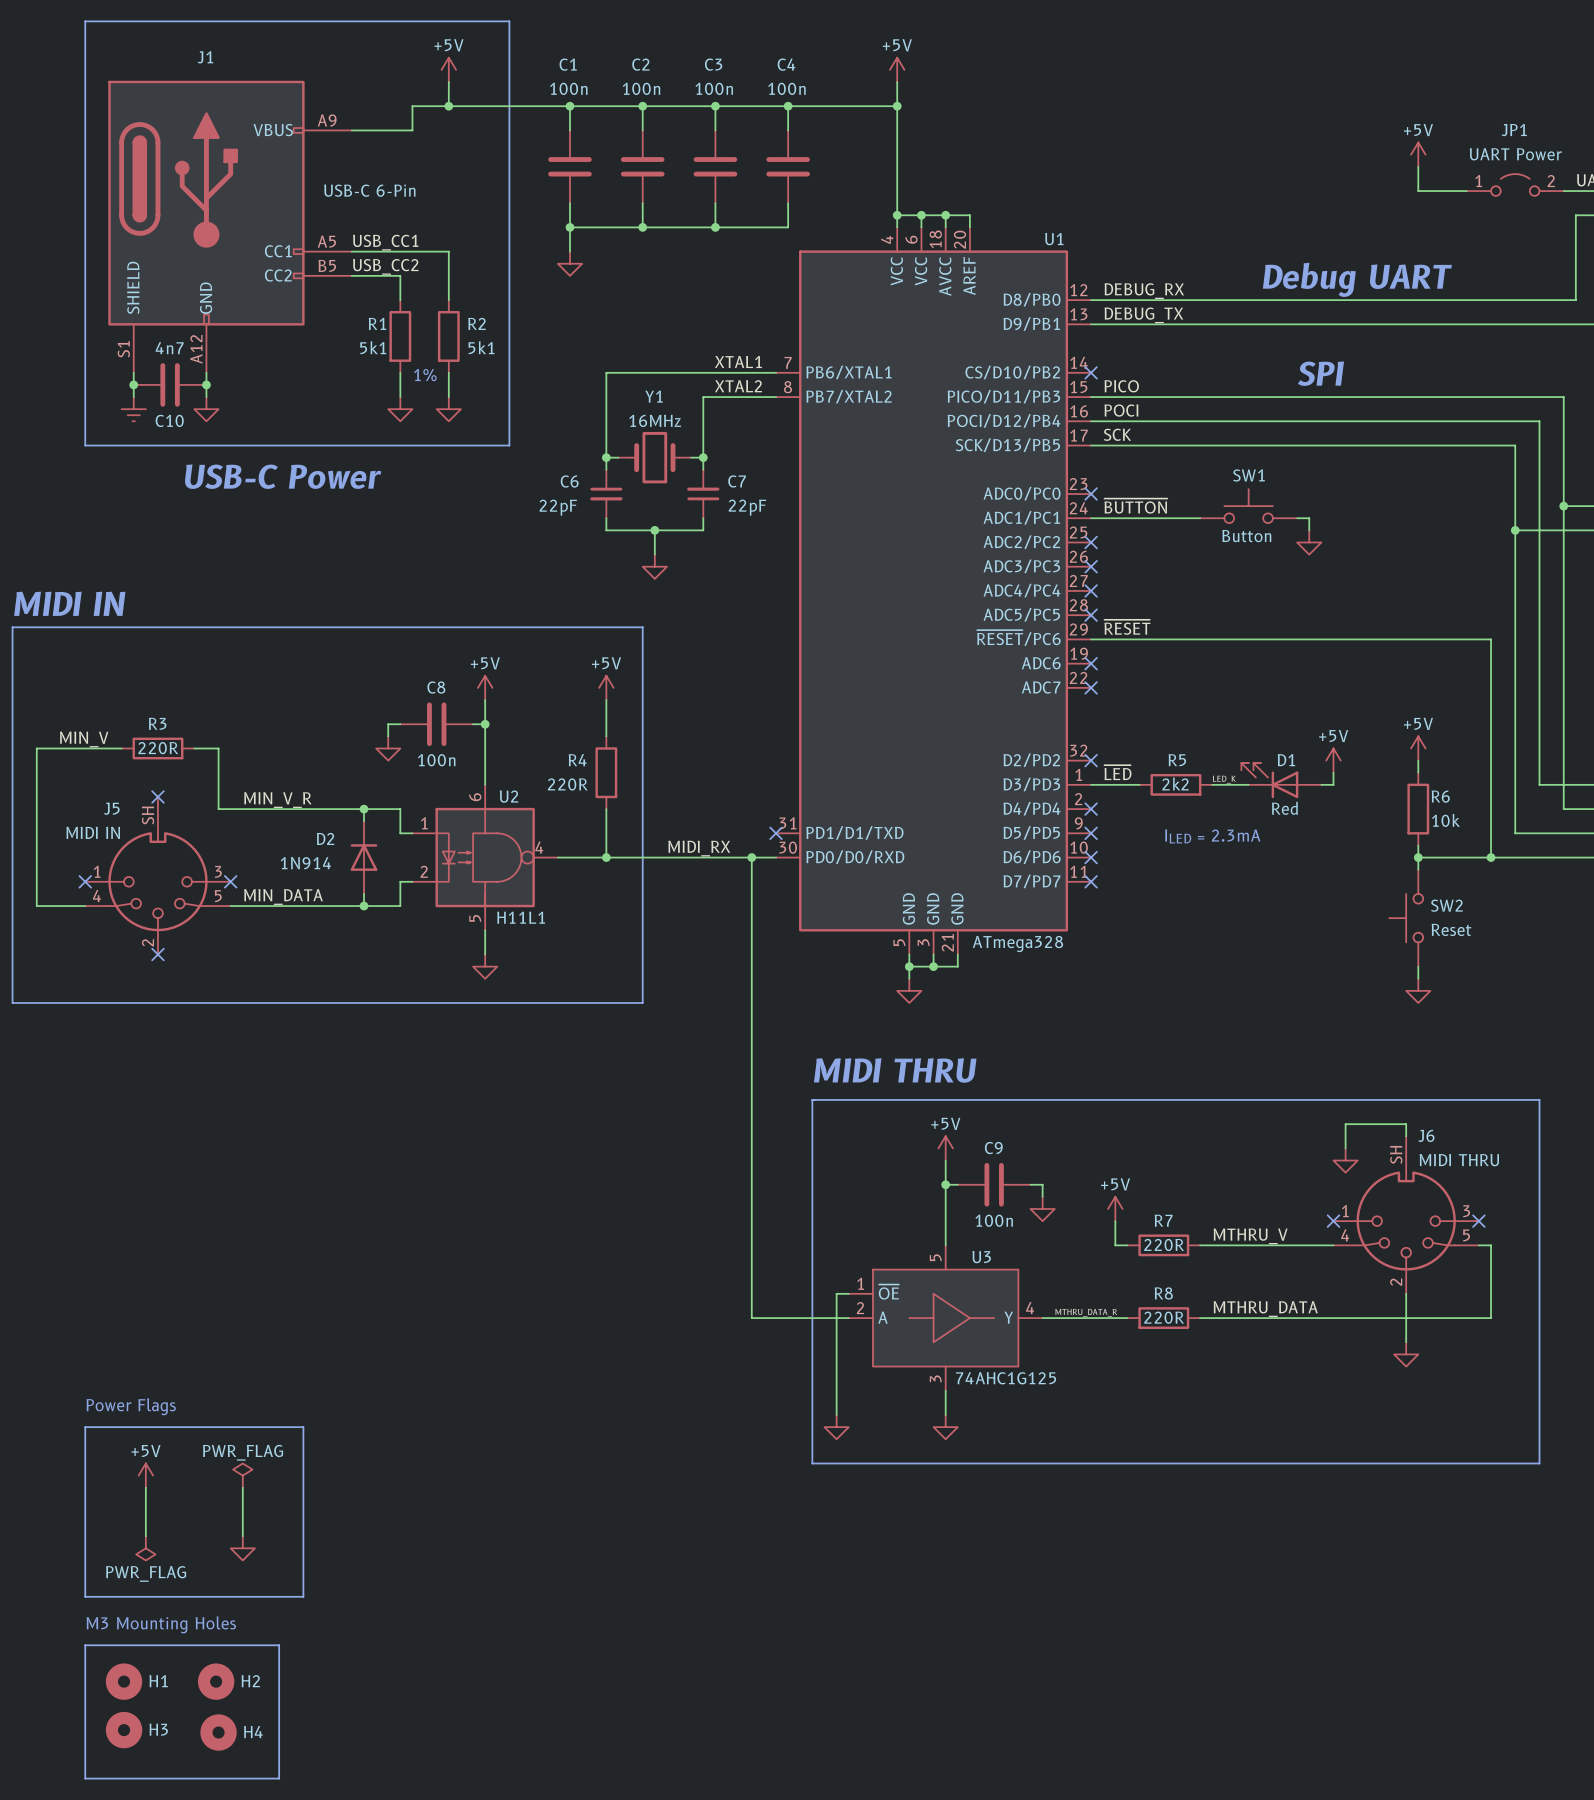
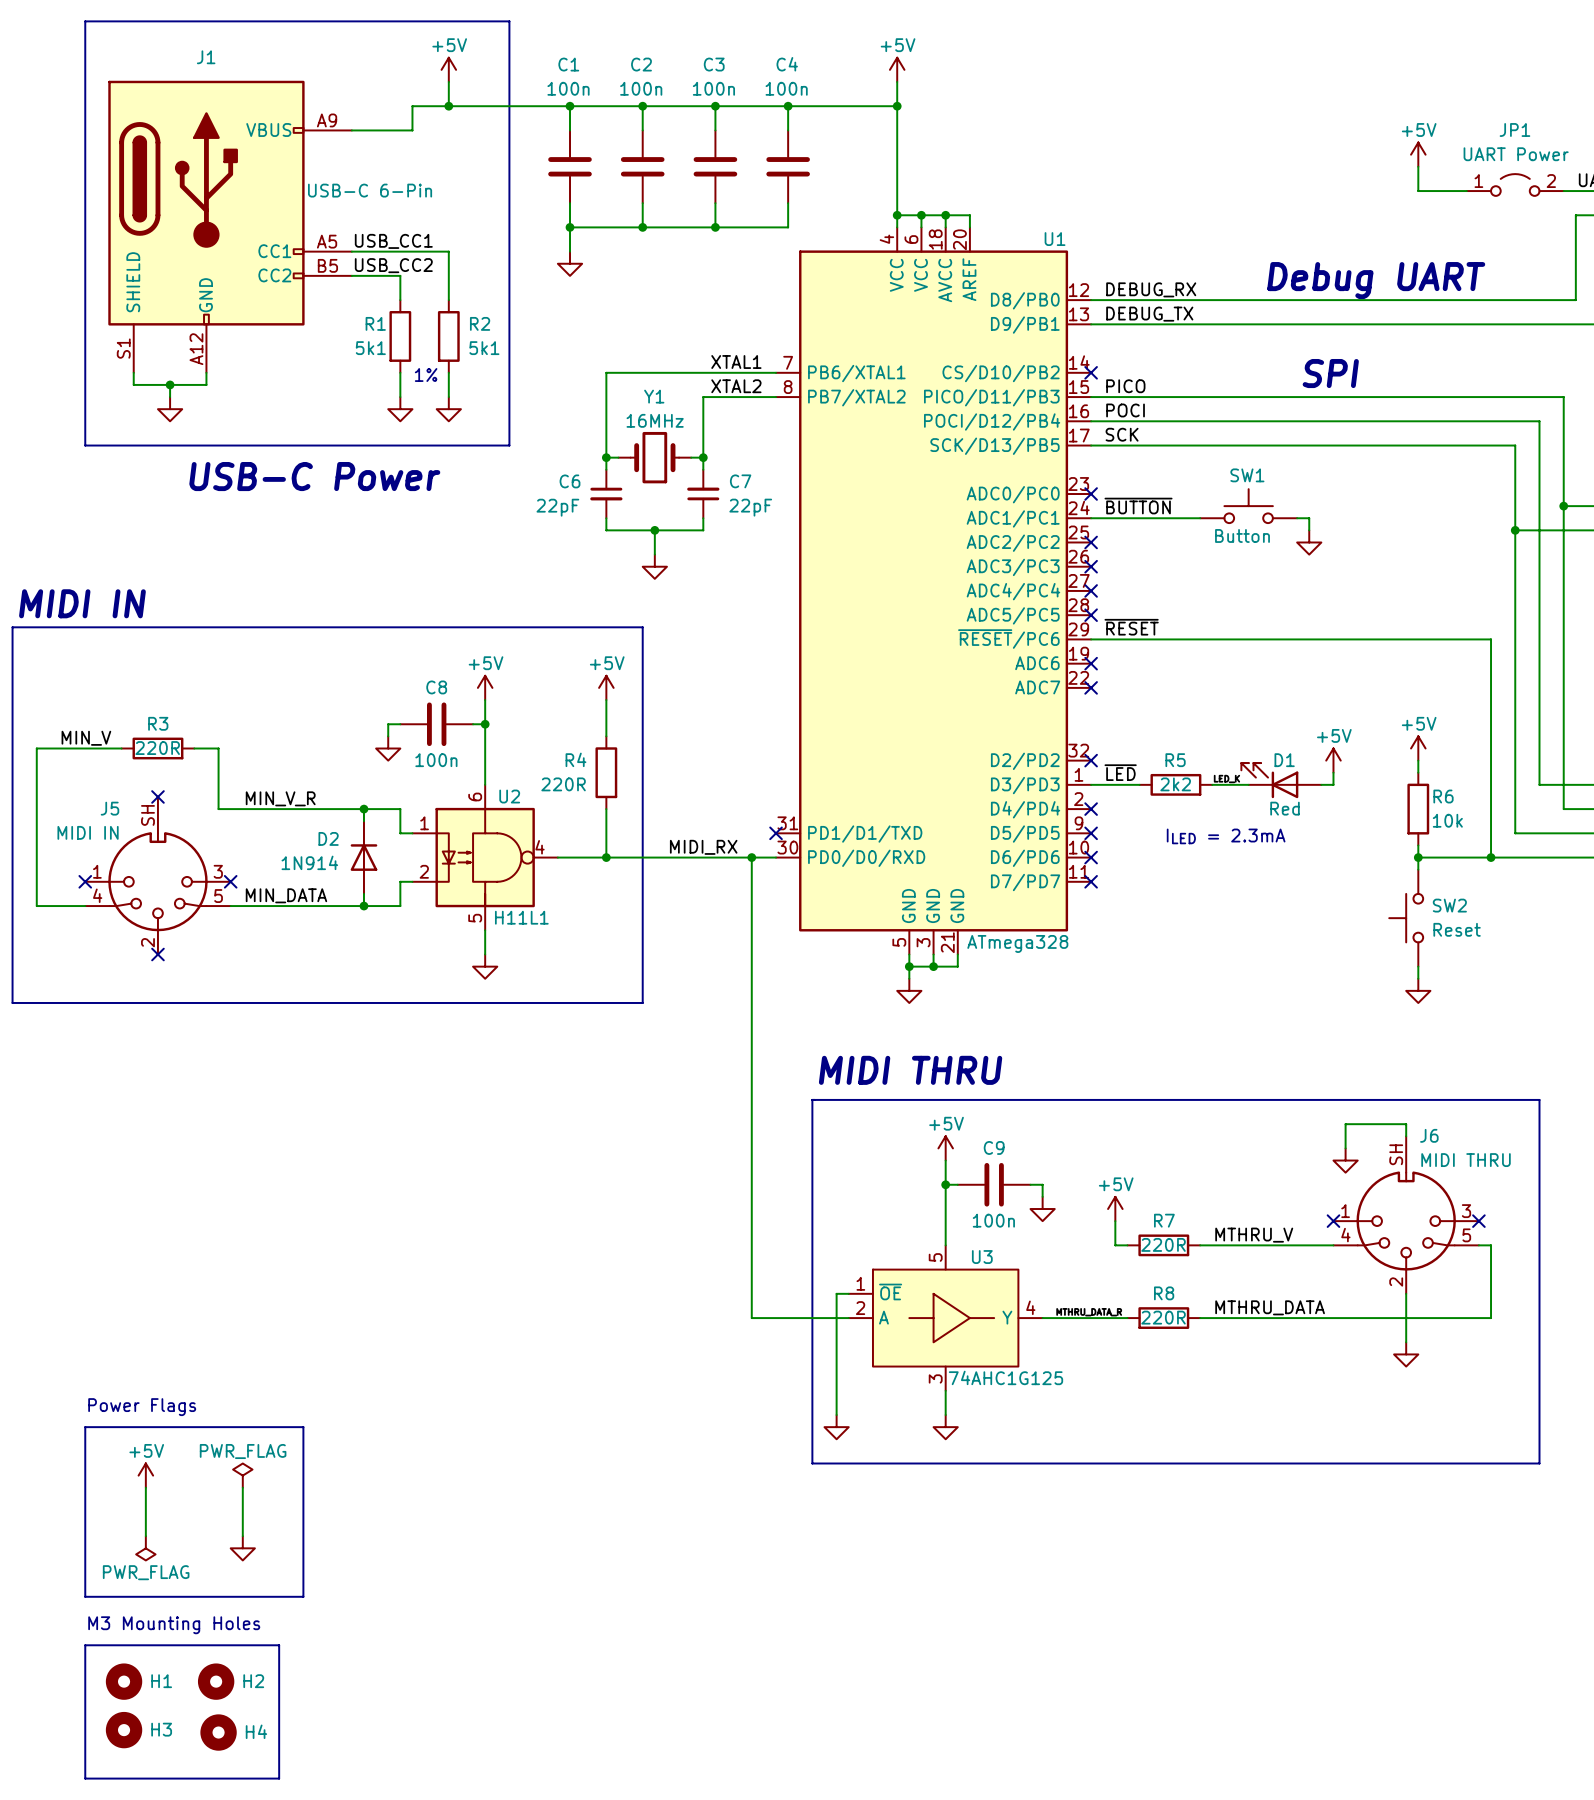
junction: (133, 384) -> none
junction: none -> (170, 384)
C10: 4n7 (170, 384) -> none
wire: (206, 384) (206, 397) -> (170, 384) (170, 397)
junction: (206, 384) -> none
power symbol: (133, 409) -> none
power symbol position: (206, 409) -> (170, 409)

